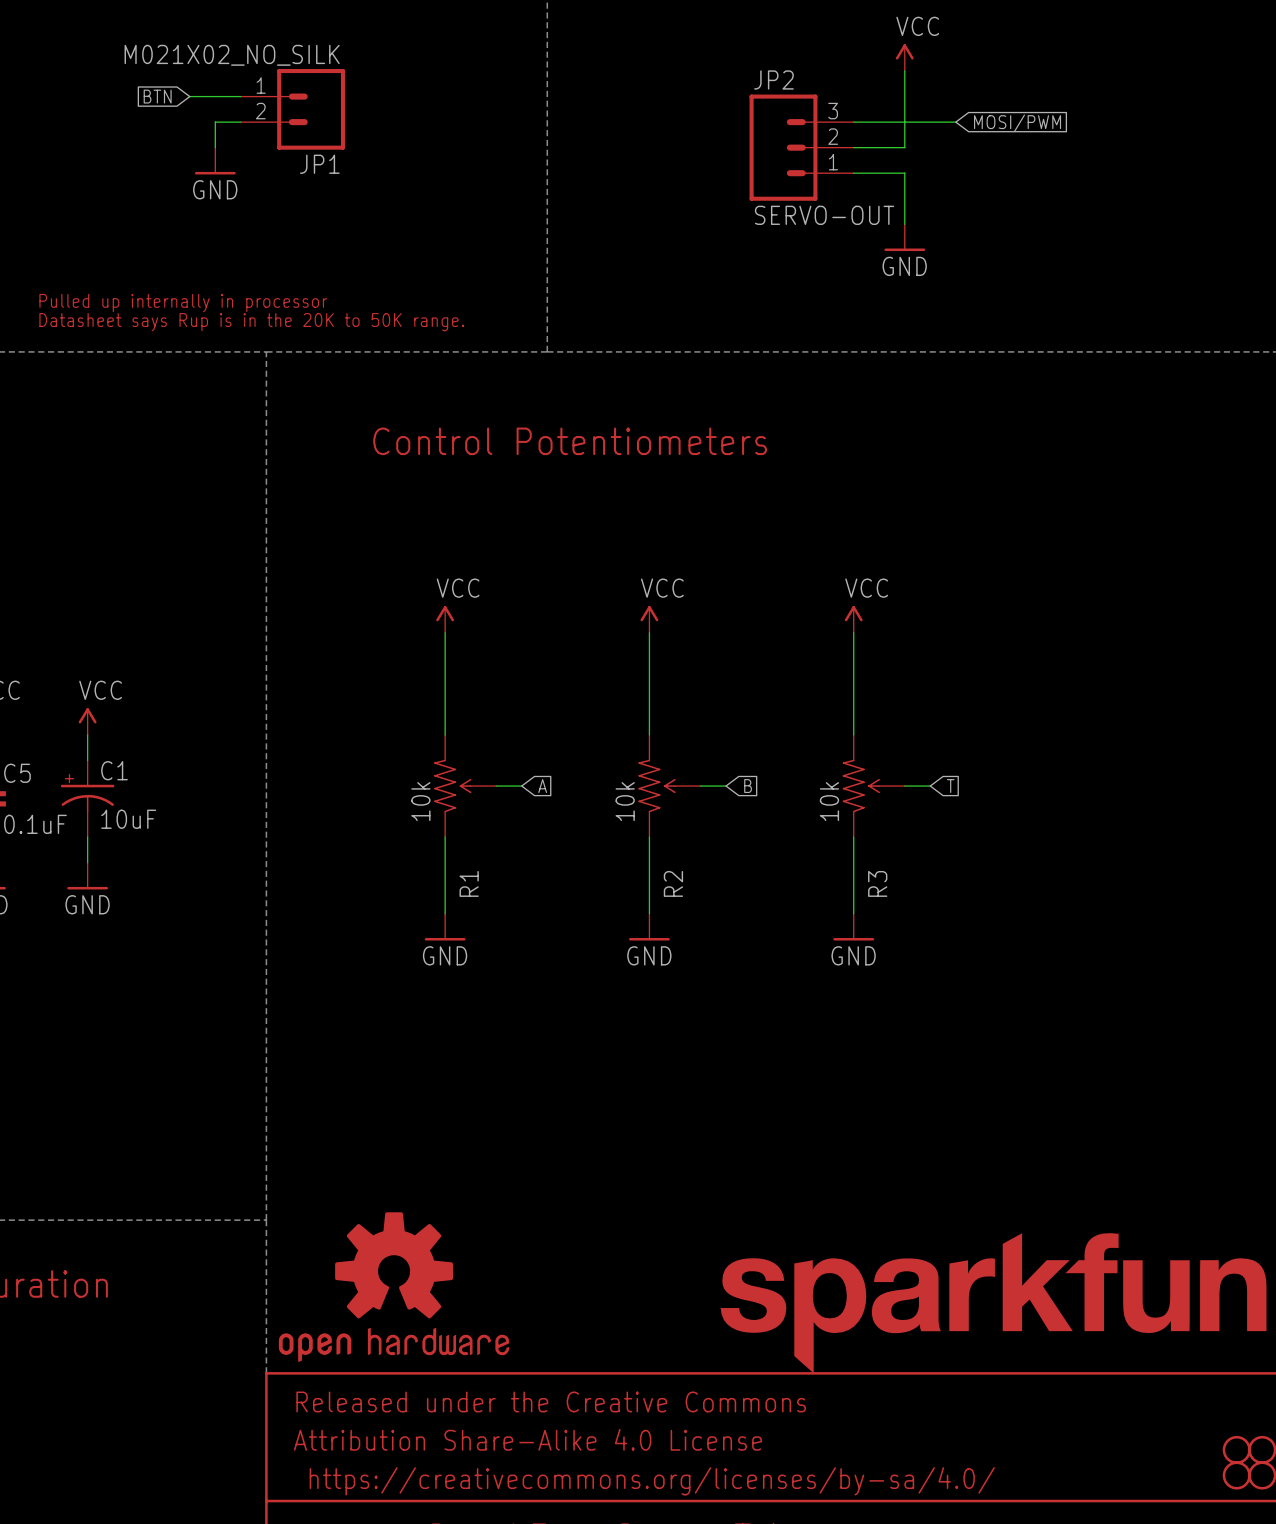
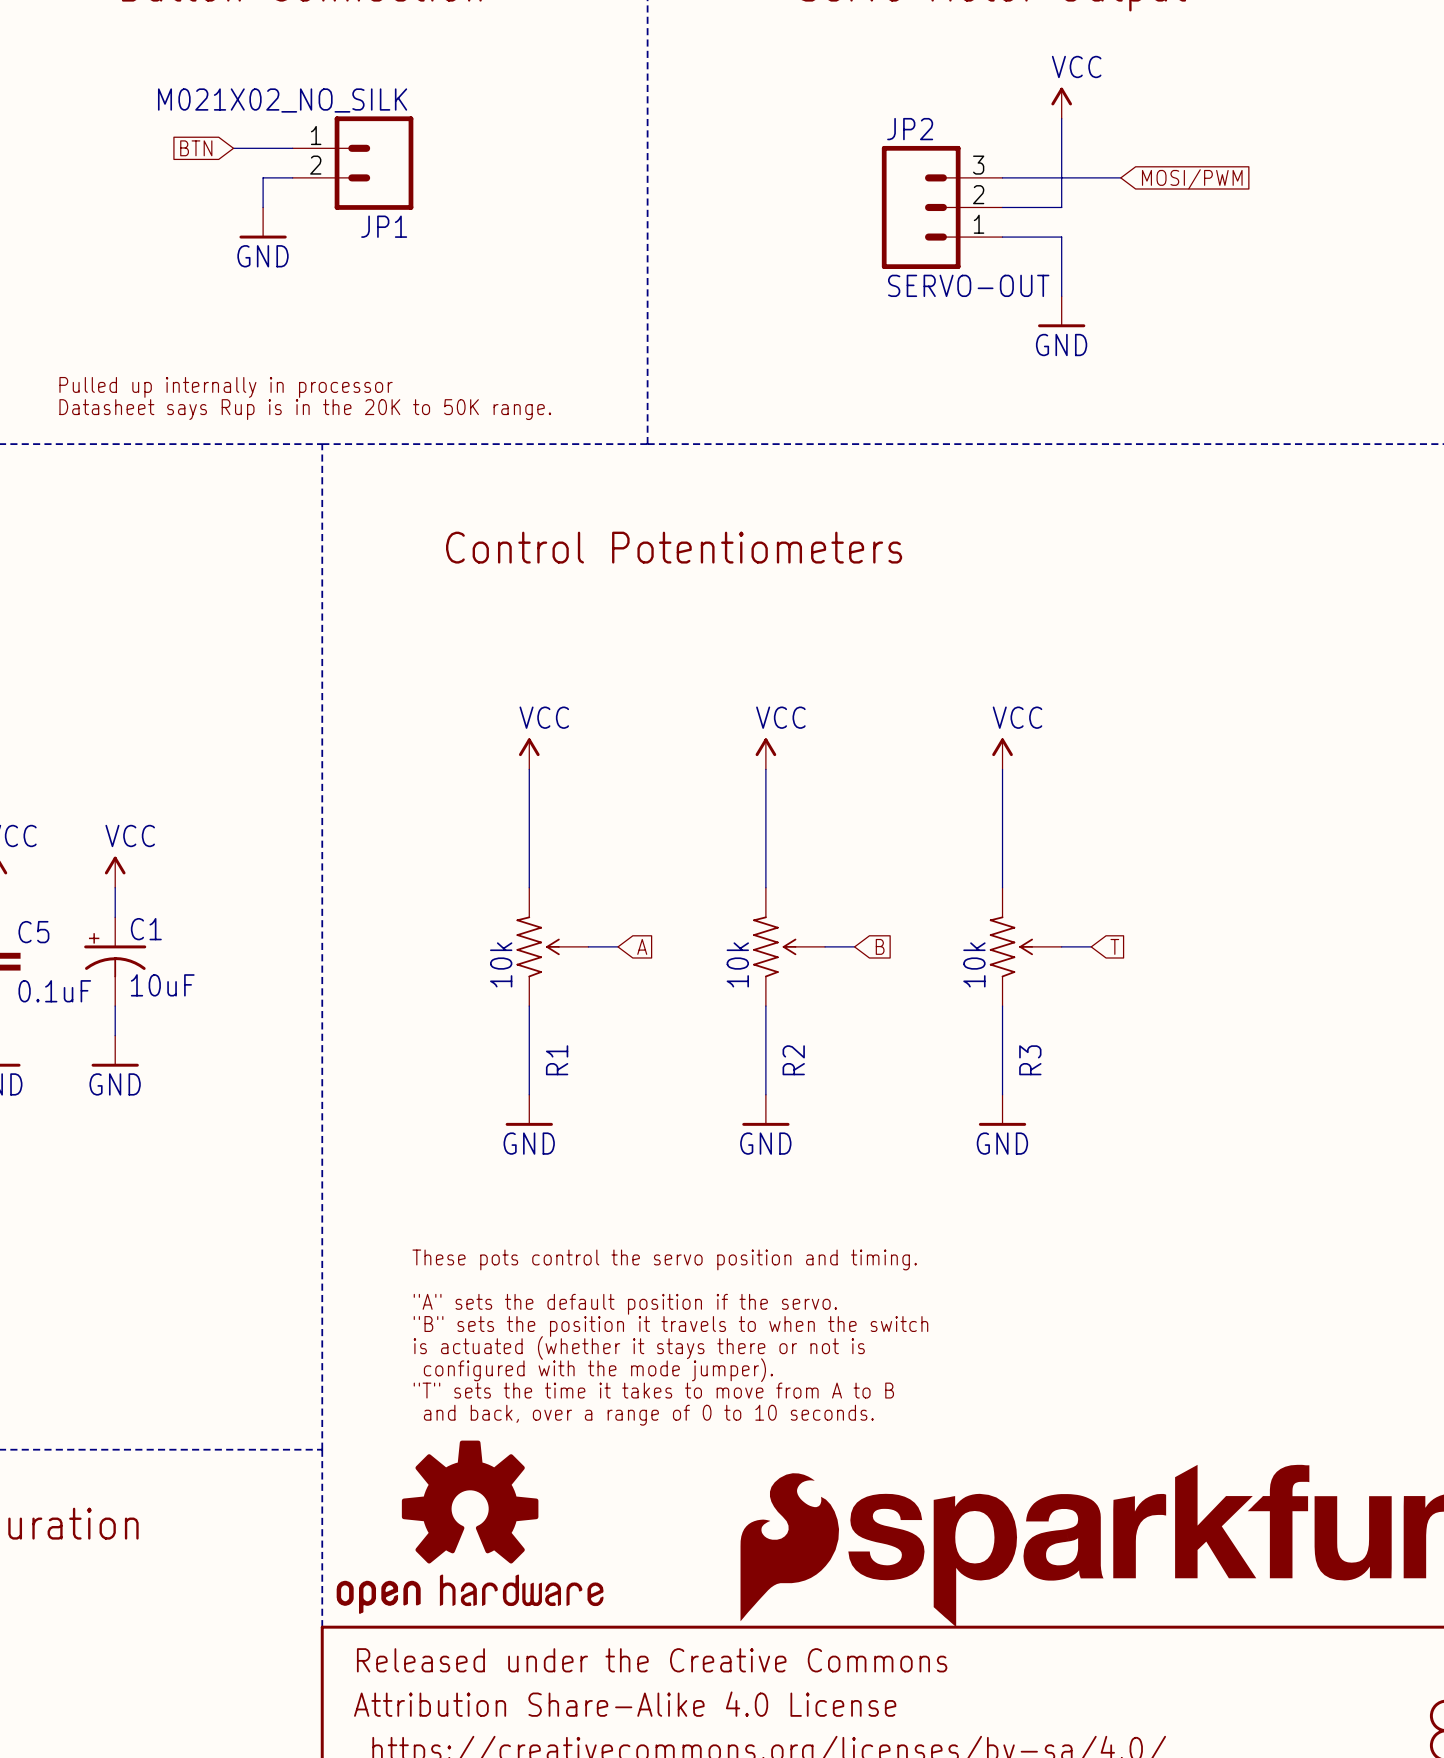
text: none -> These pots control the servo position and timing. (664, 1259)
text: none -> "A" sets the default position if the servo. (625, 1304)
text: none -> "B" sets the position it travels to when the switch (670, 1326)
text: none -> is actuated (whether it stays there or not is (639, 1347)
text: none -> configured with the mode jumper). (598, 1370)
text: none -> "T" sets the time it takes to move from A to B (653, 1390)
text: none -> and back, over a range of 0 to 10 seconds. (648, 1415)
part: none -> (789, 1547)

